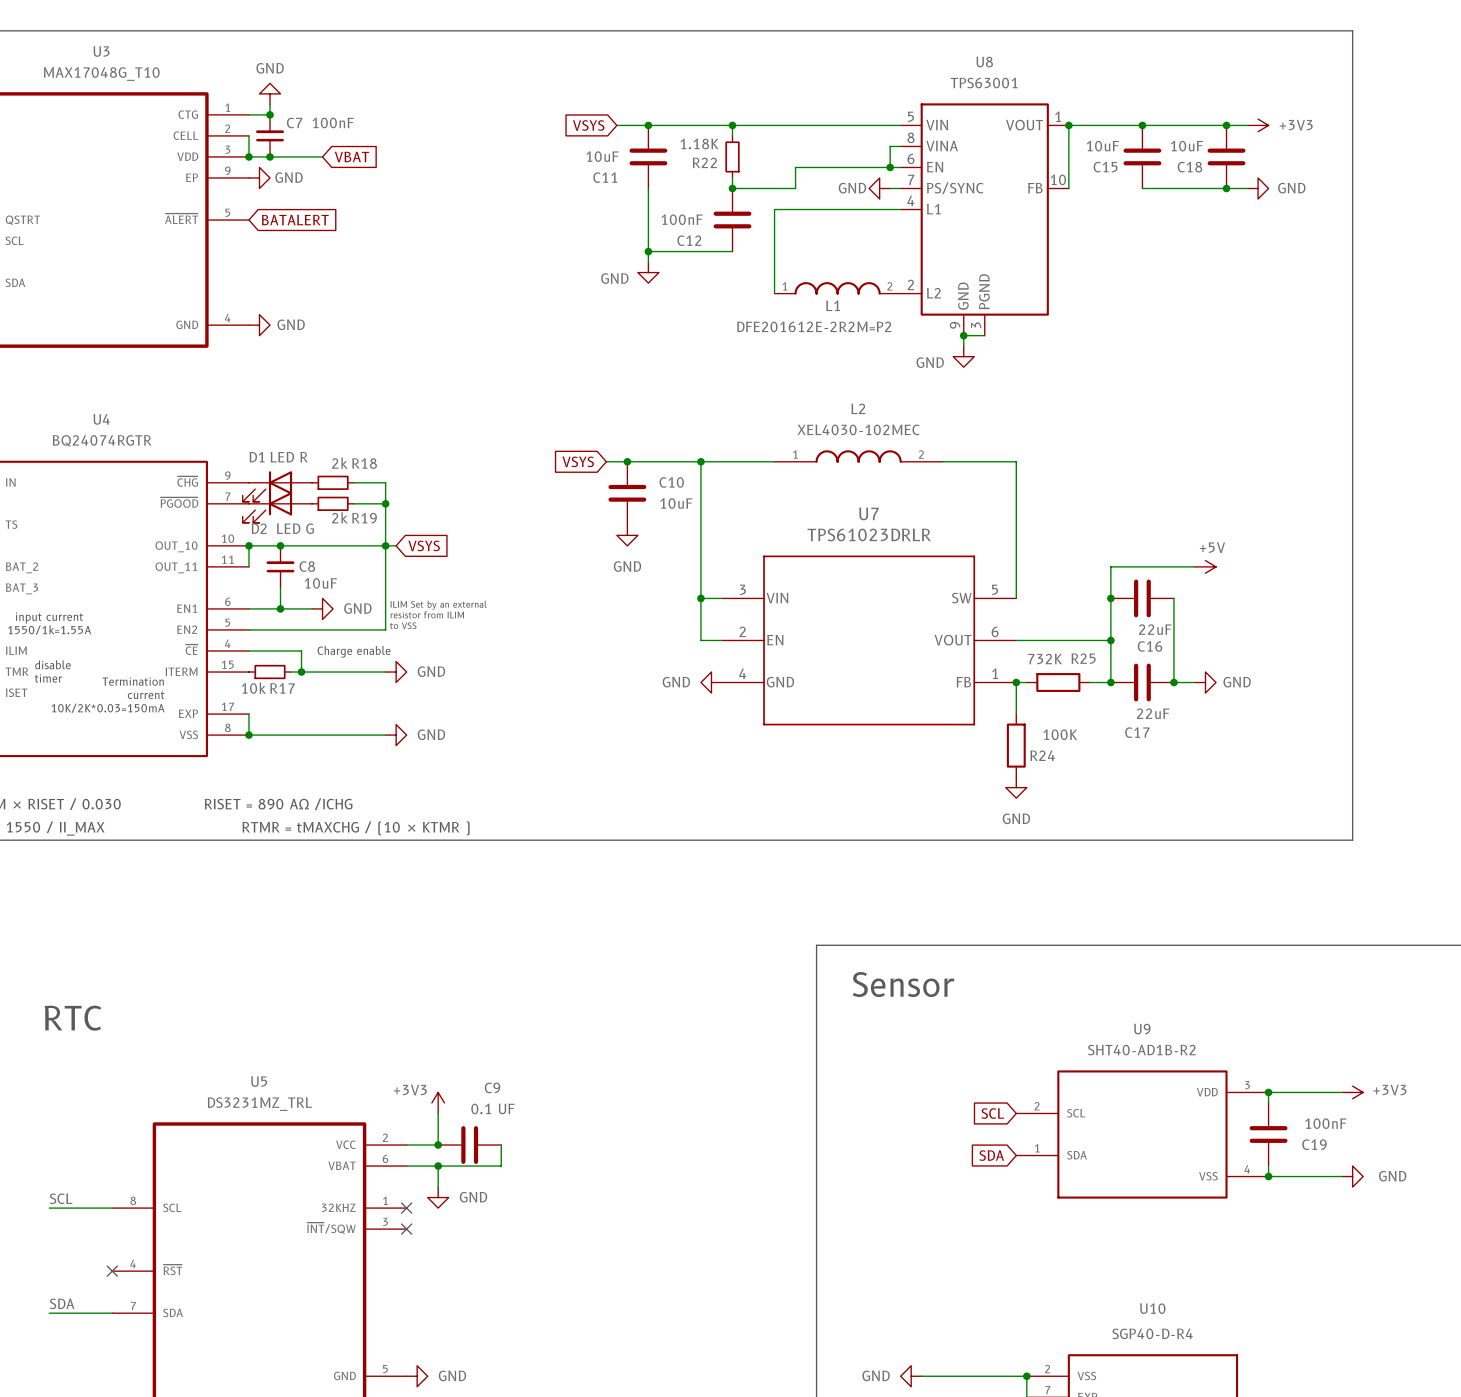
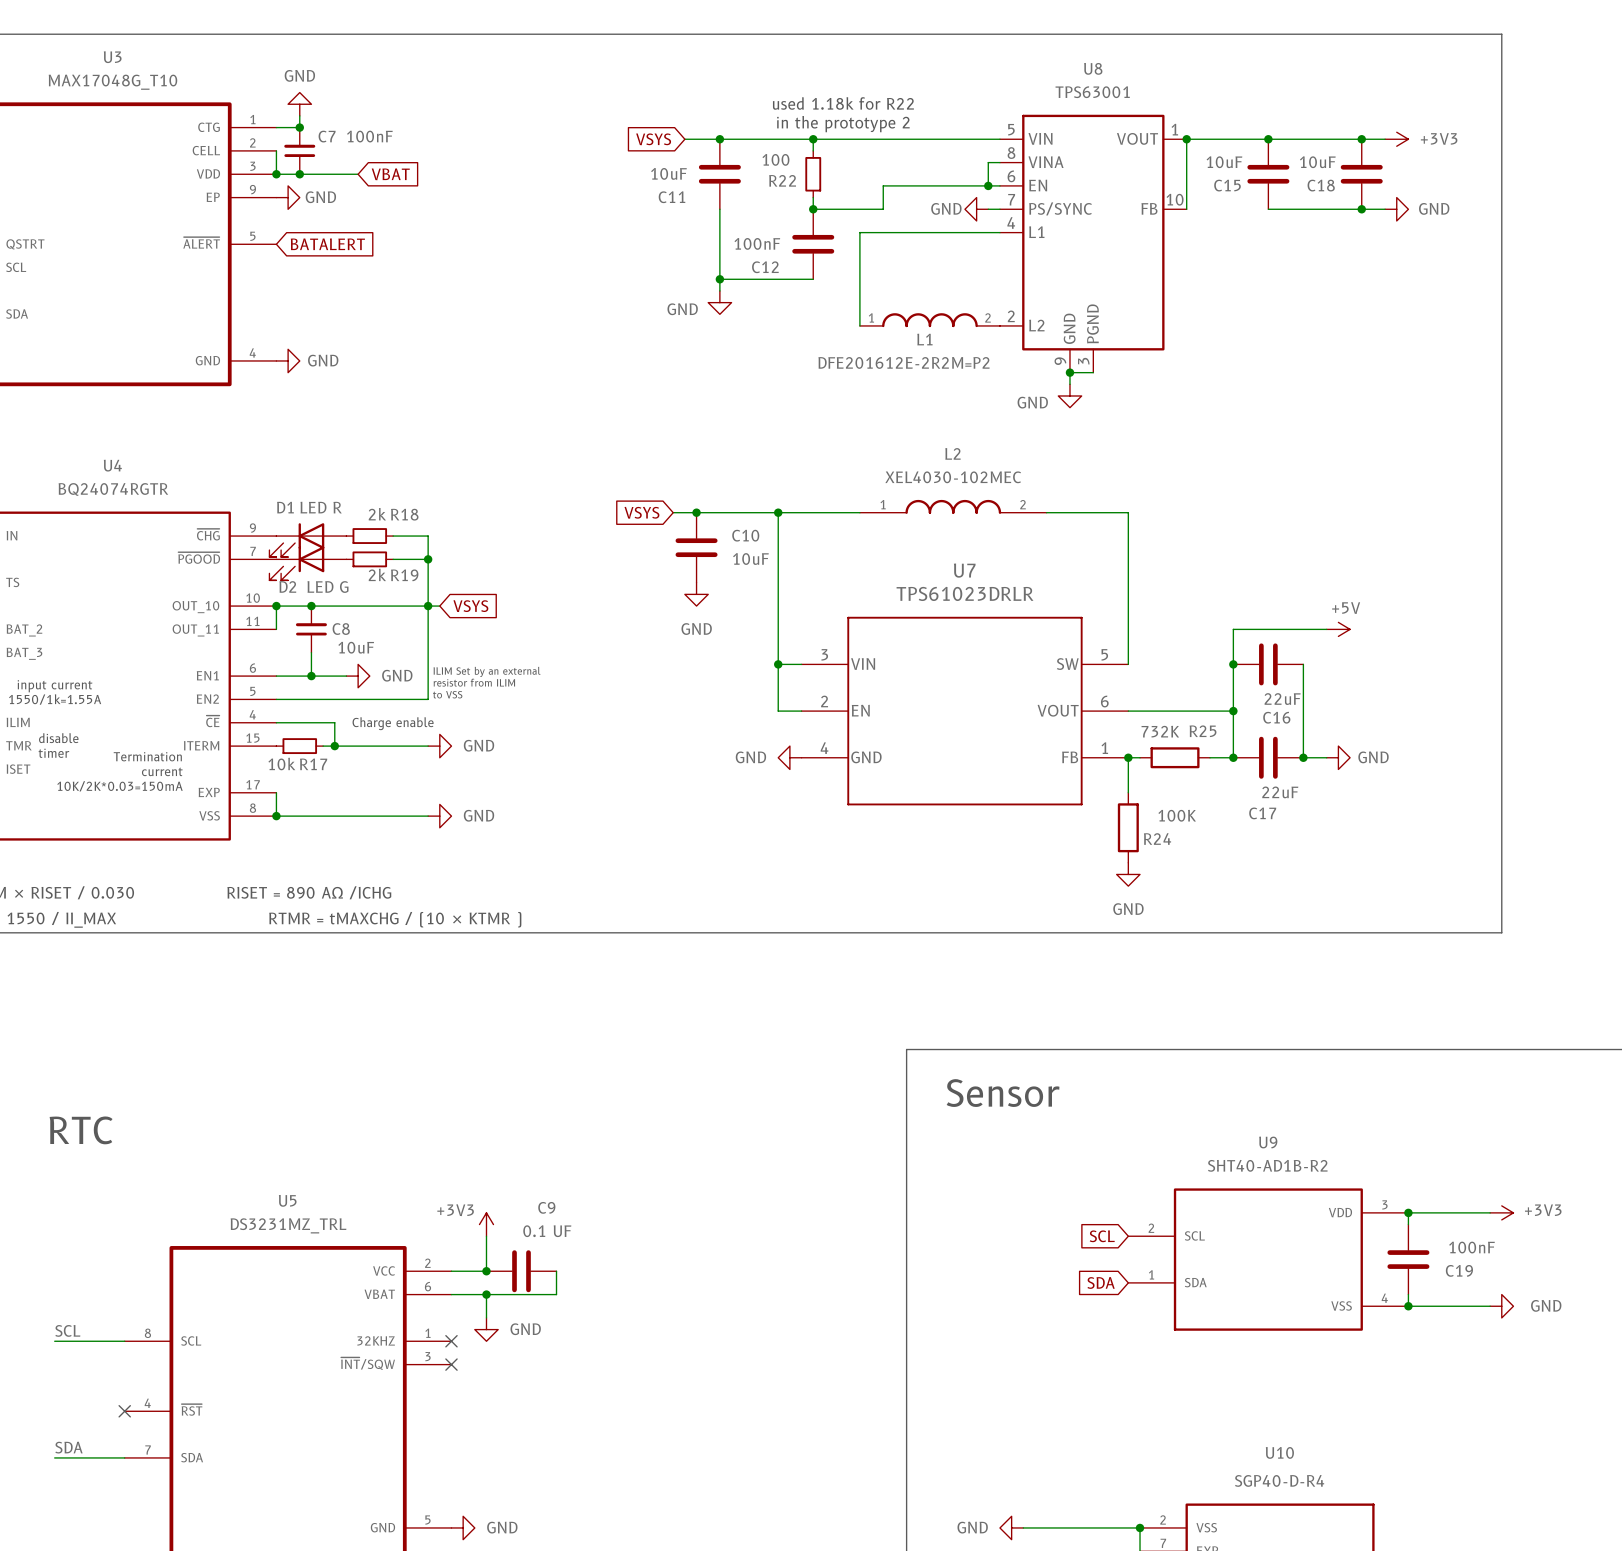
text: none -> used 1.18k for R22 (843, 103)
text: none -> in the prototype 2 (843, 124)
R22 value: 1.18K (699, 144) -> 100 (775, 159)

